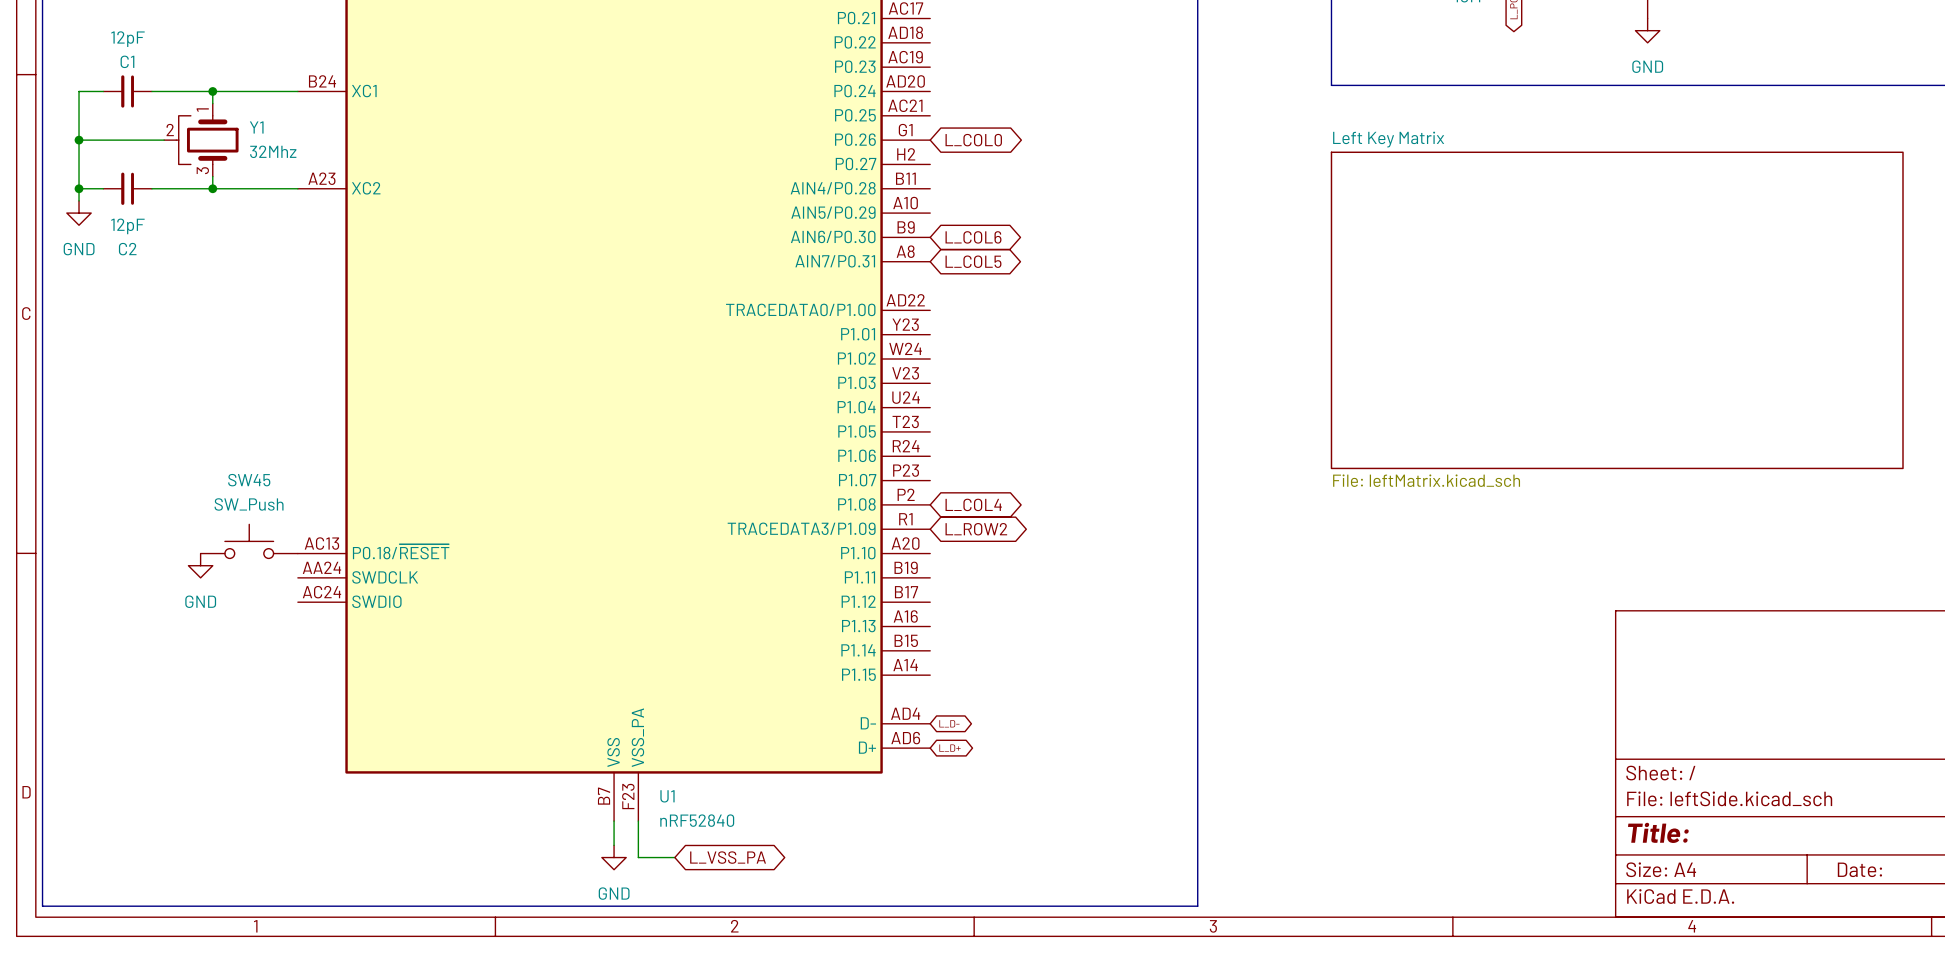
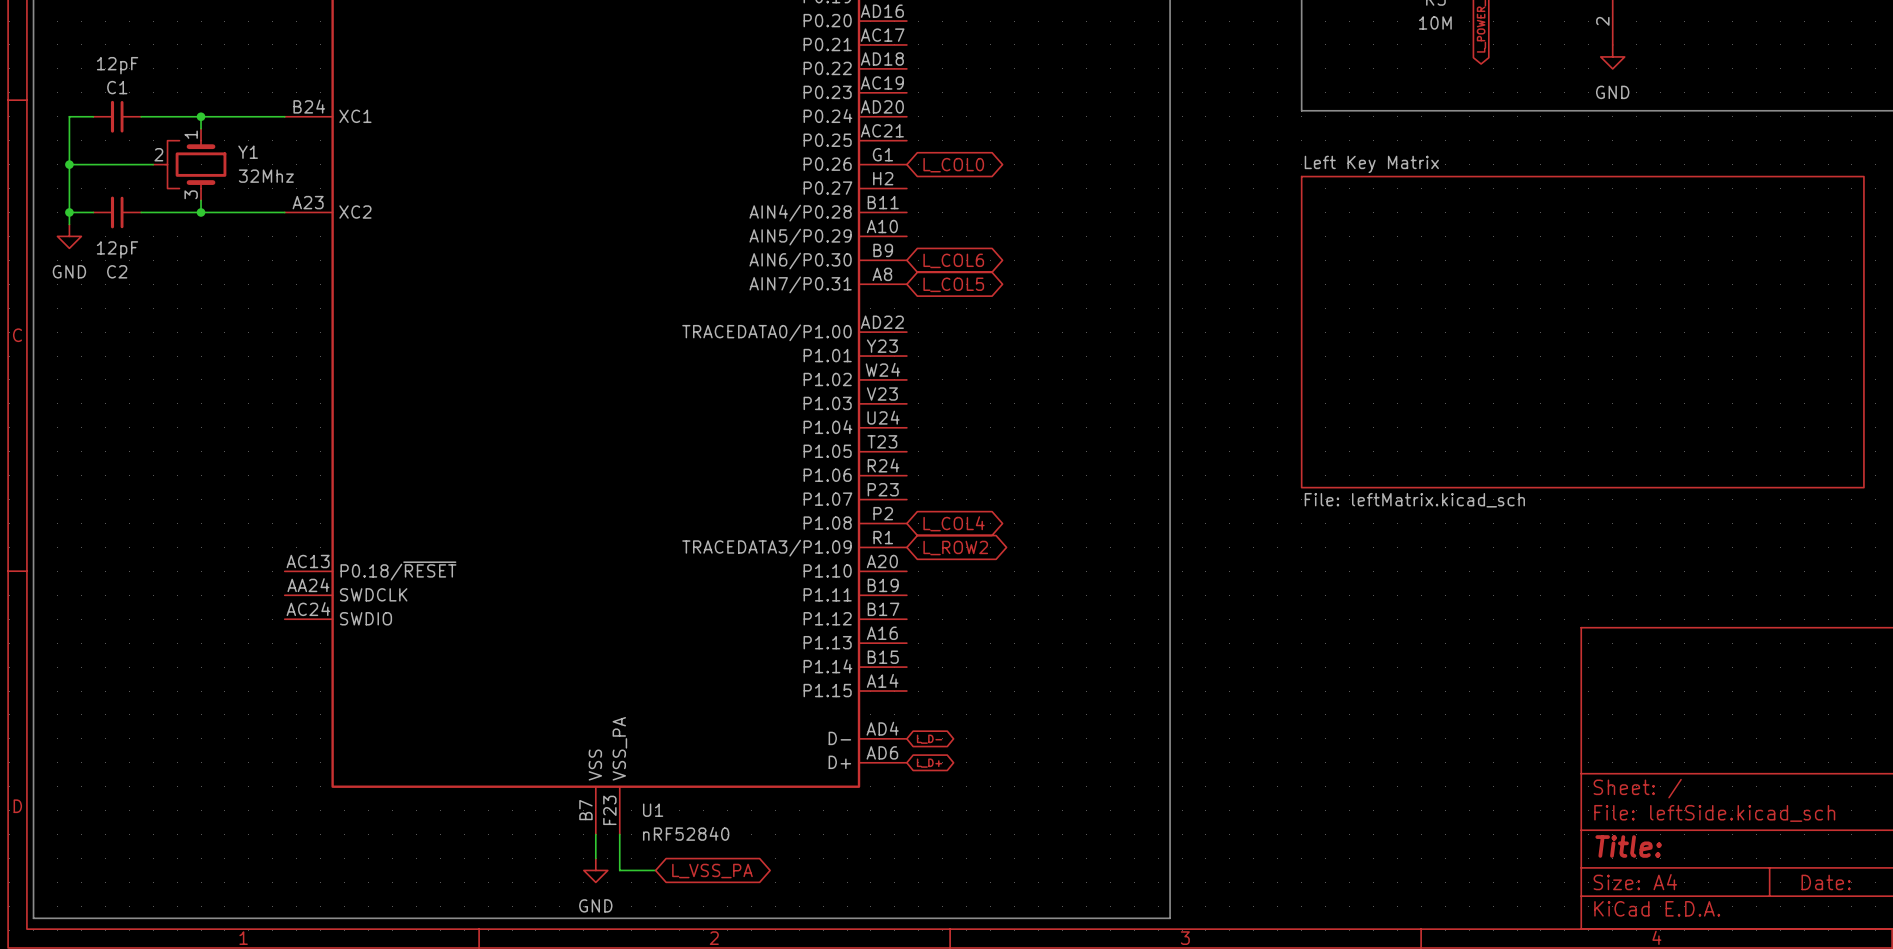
SW45: SW_Push (249, 541) -> none
power symbol: GND (200, 565) -> none

